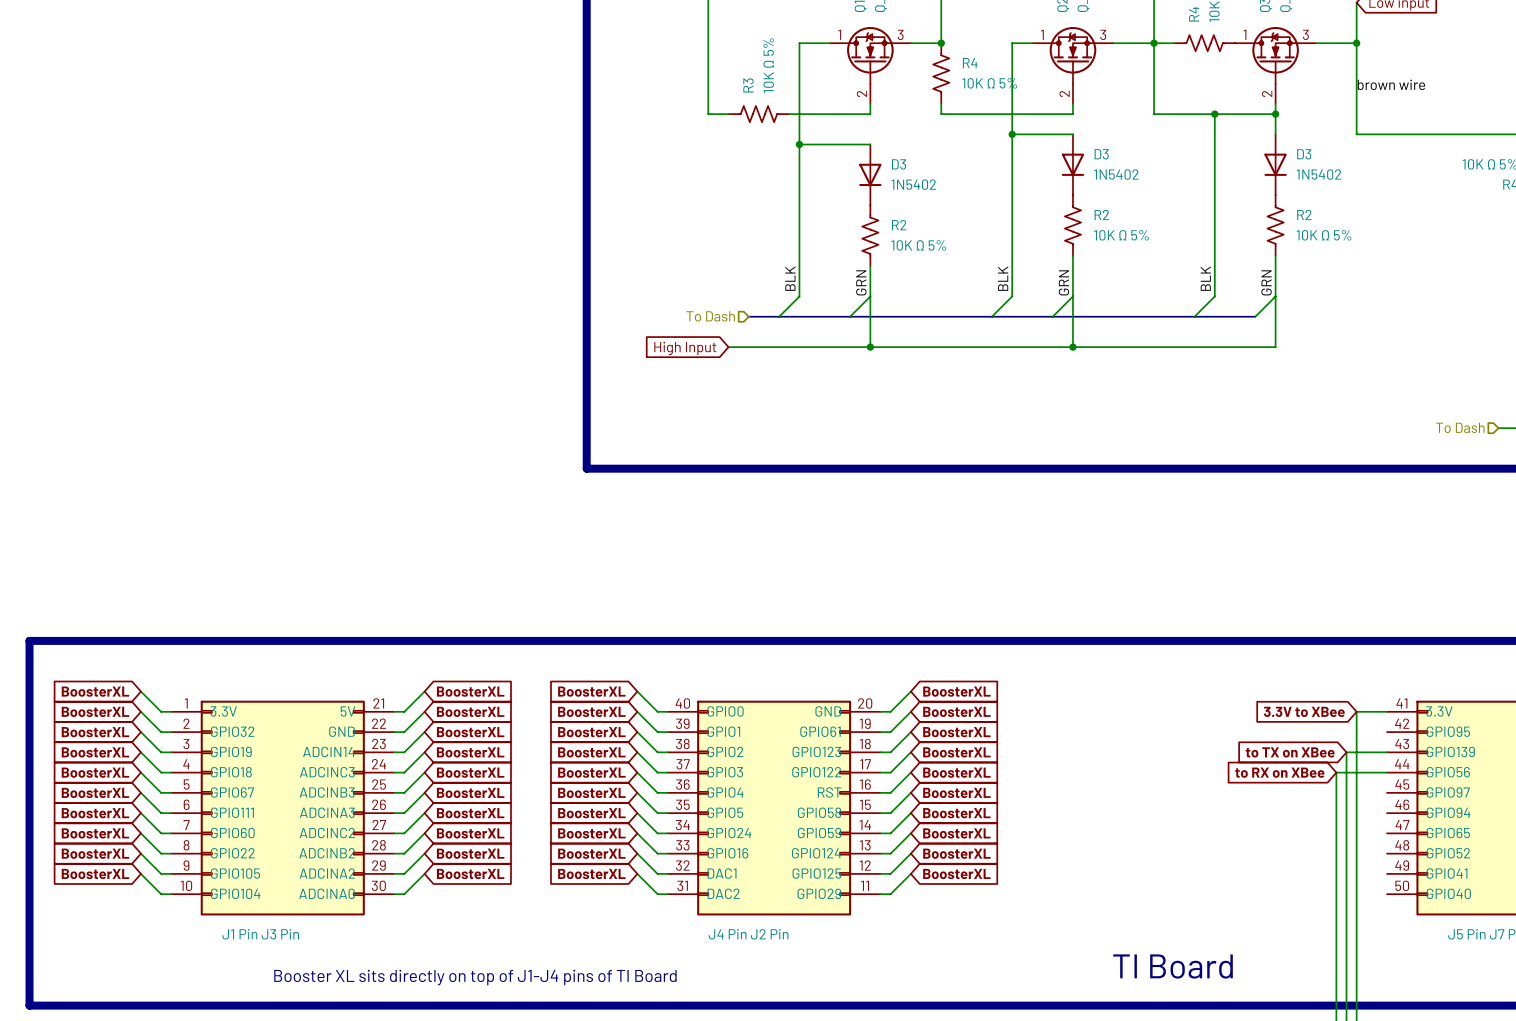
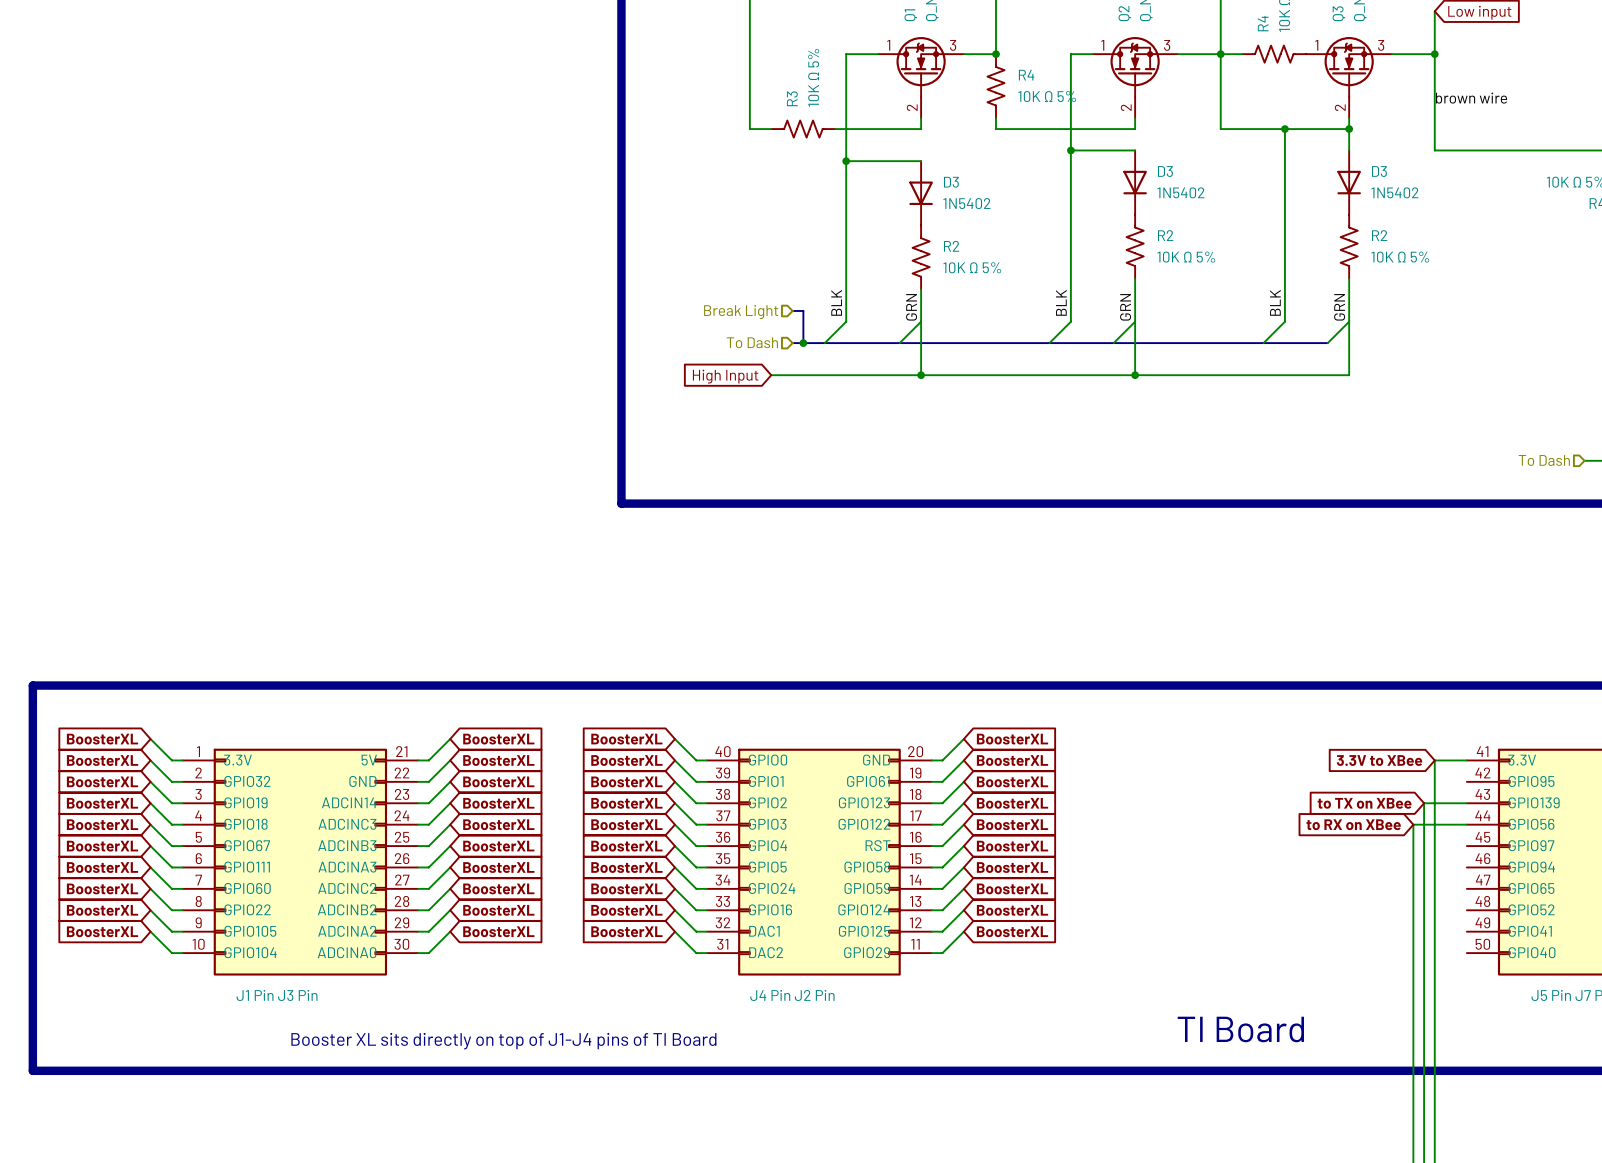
bus: none -> (792, 310) (803, 310) (803, 343)
hierarchical label: none -> Break Light (741, 312)
junction: none -> (803, 343)

